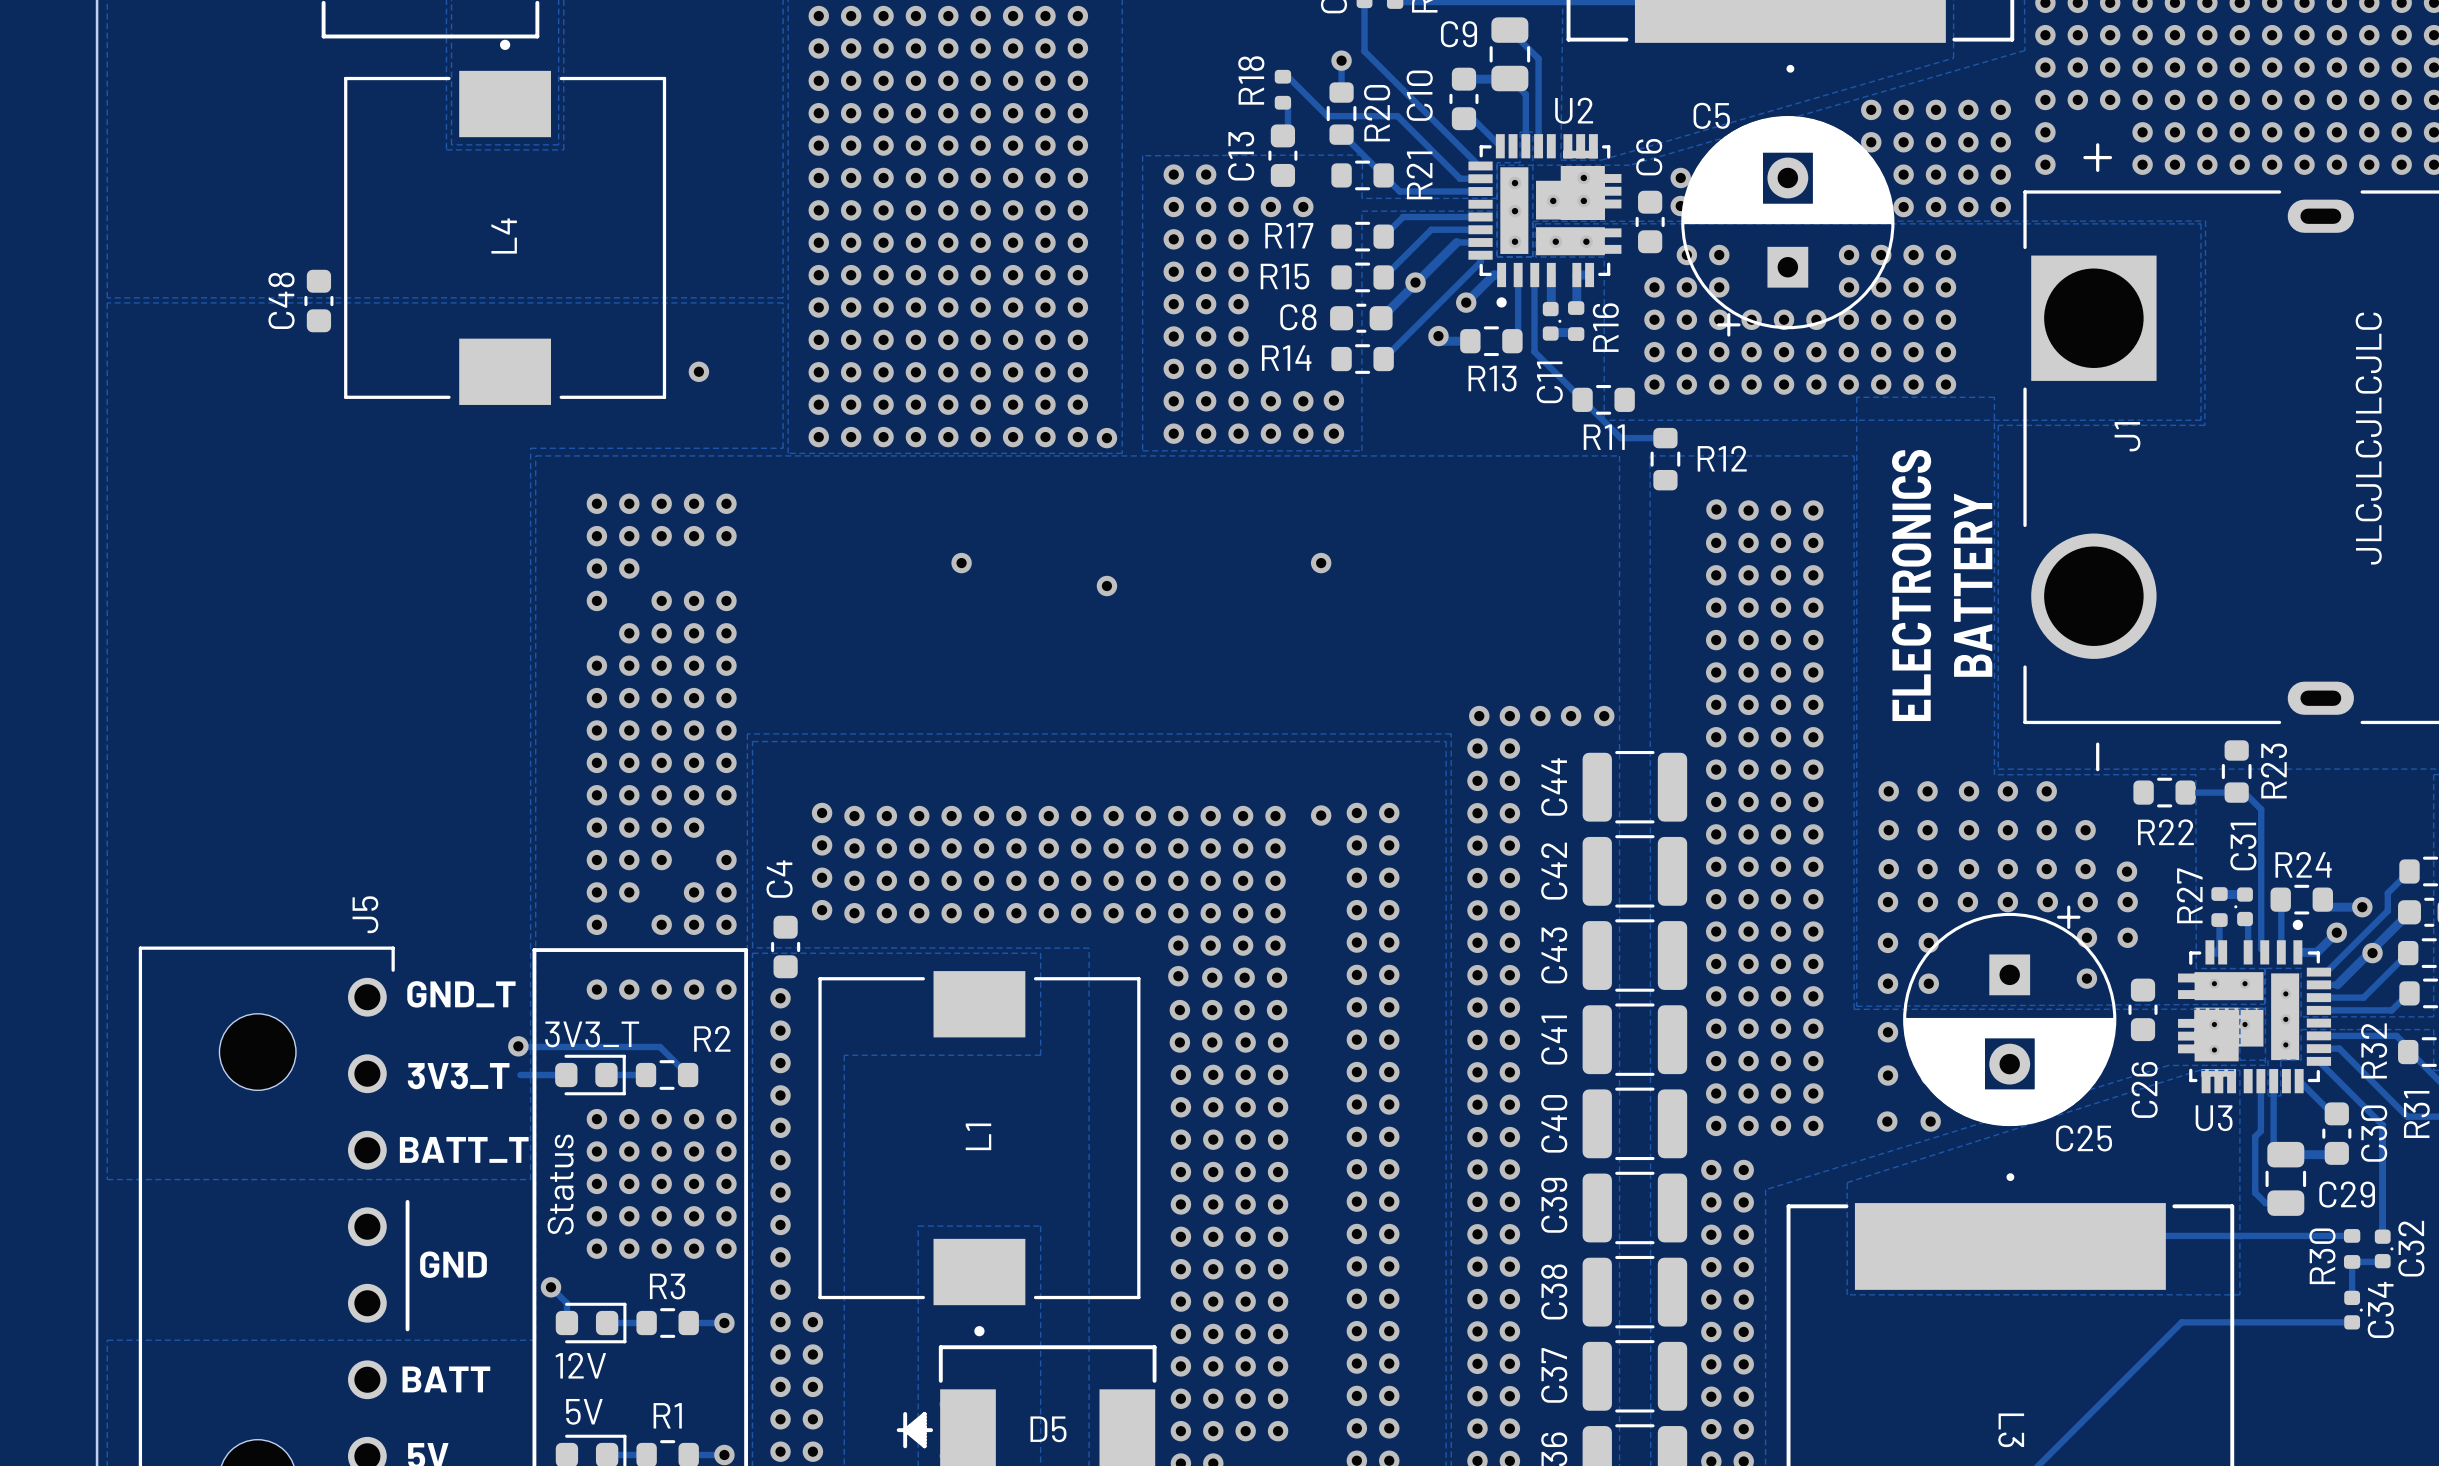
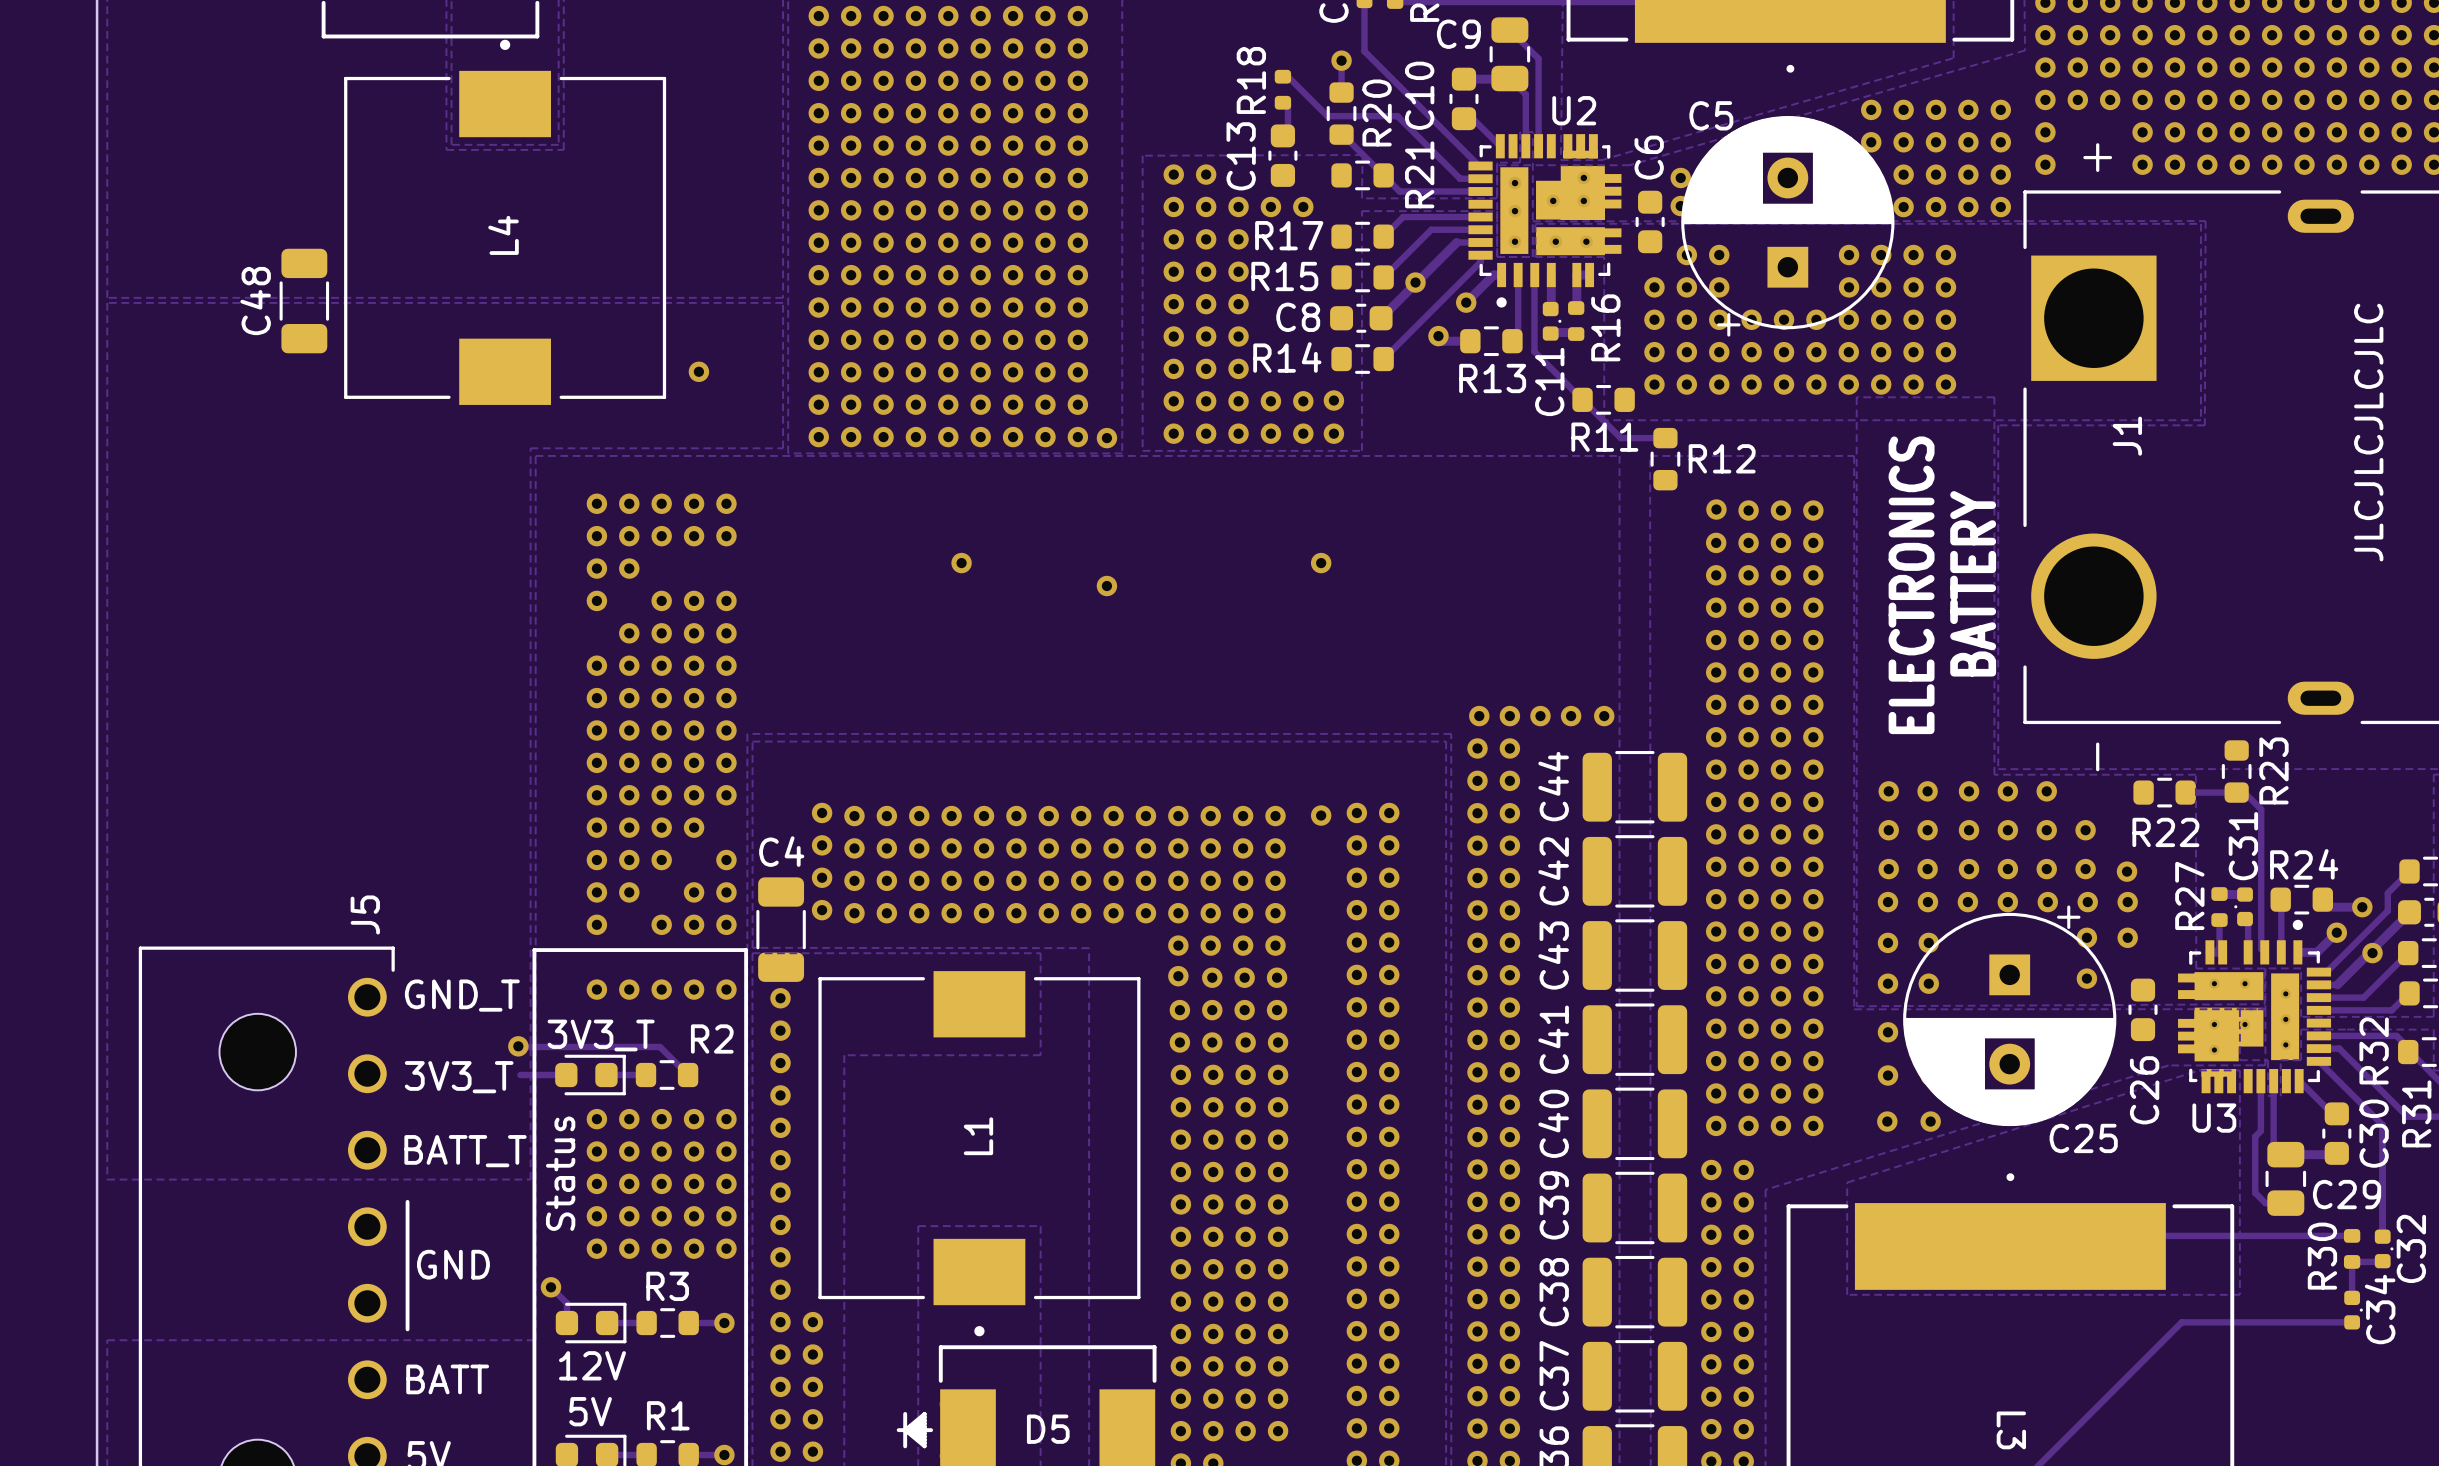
C48 footprint: [304, 269, 334, 333] -> [279, 248, 330, 354]
C4 footprint: [771, 915, 801, 979] -> [756, 877, 806, 982]

